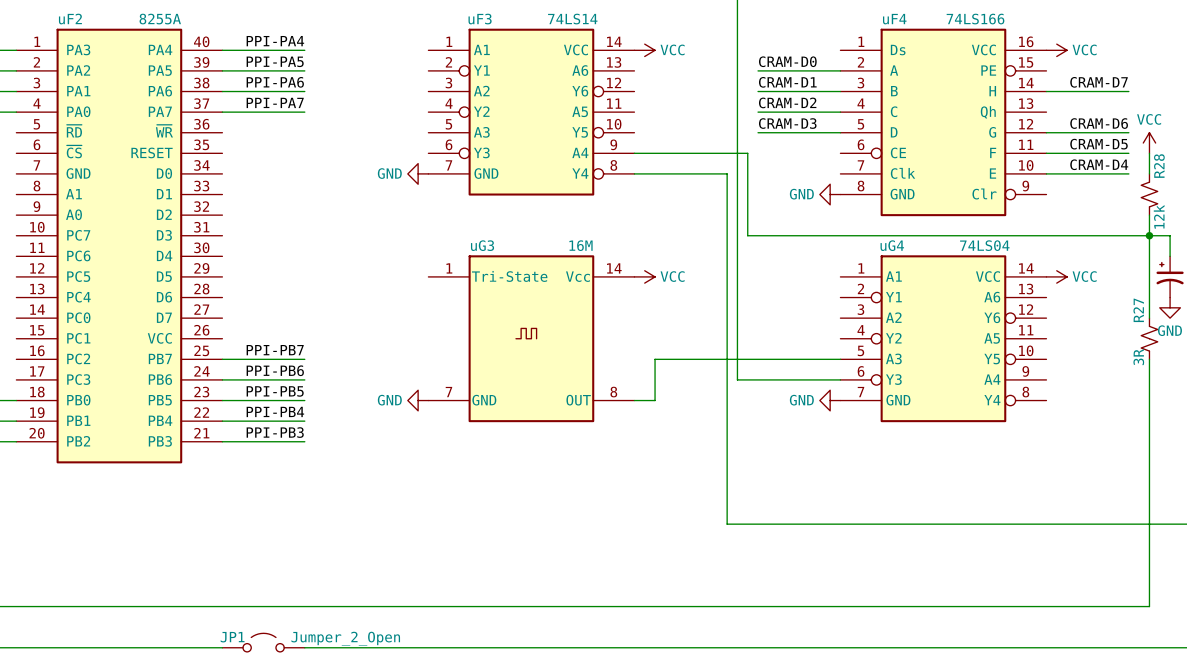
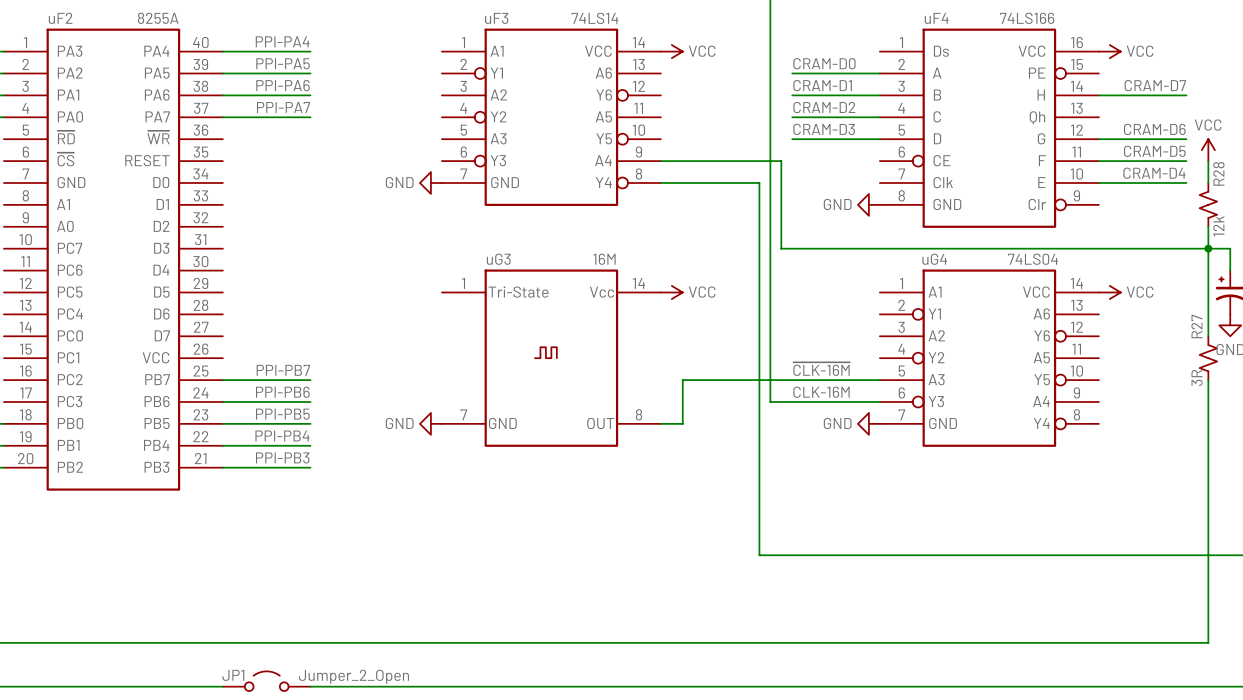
label: none -> ~{CLK-16M} (821, 369)
label: none -> CLK-16M (821, 392)

